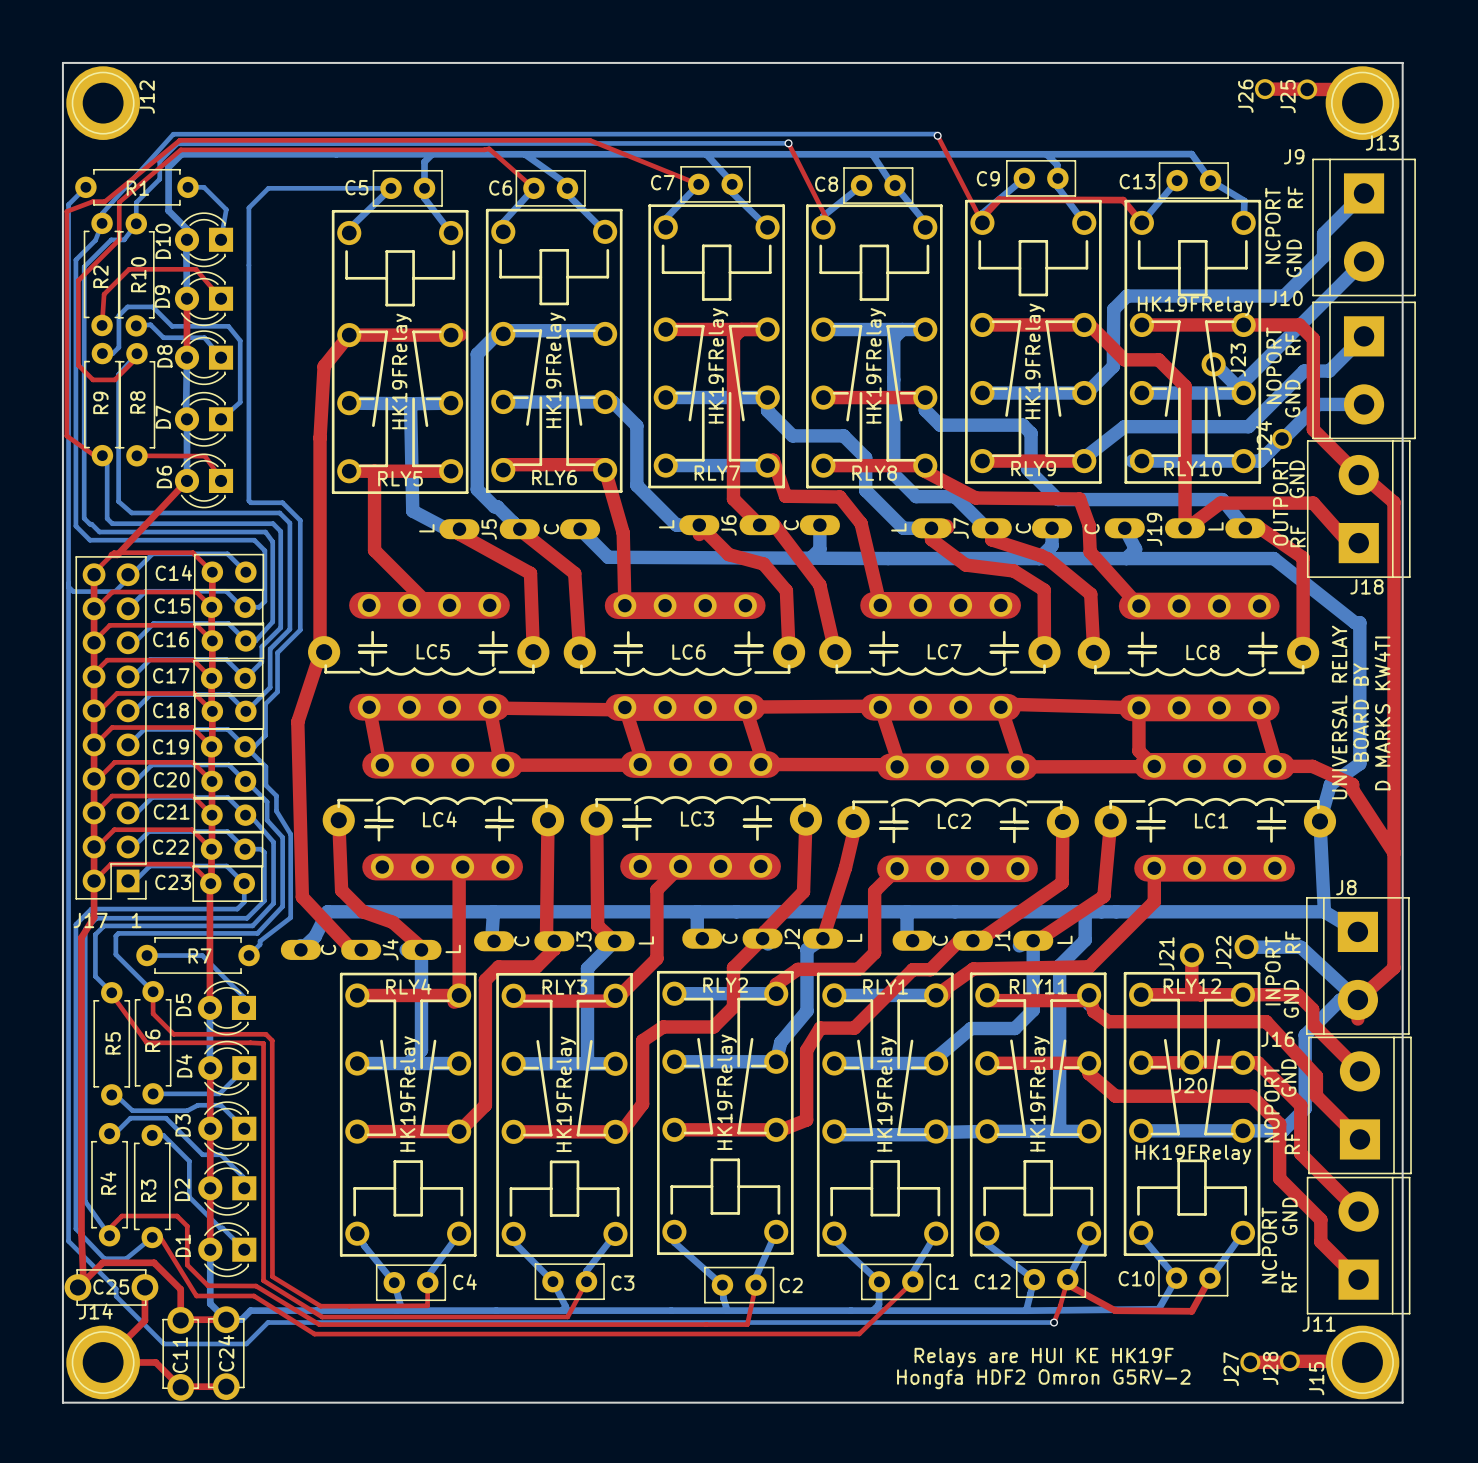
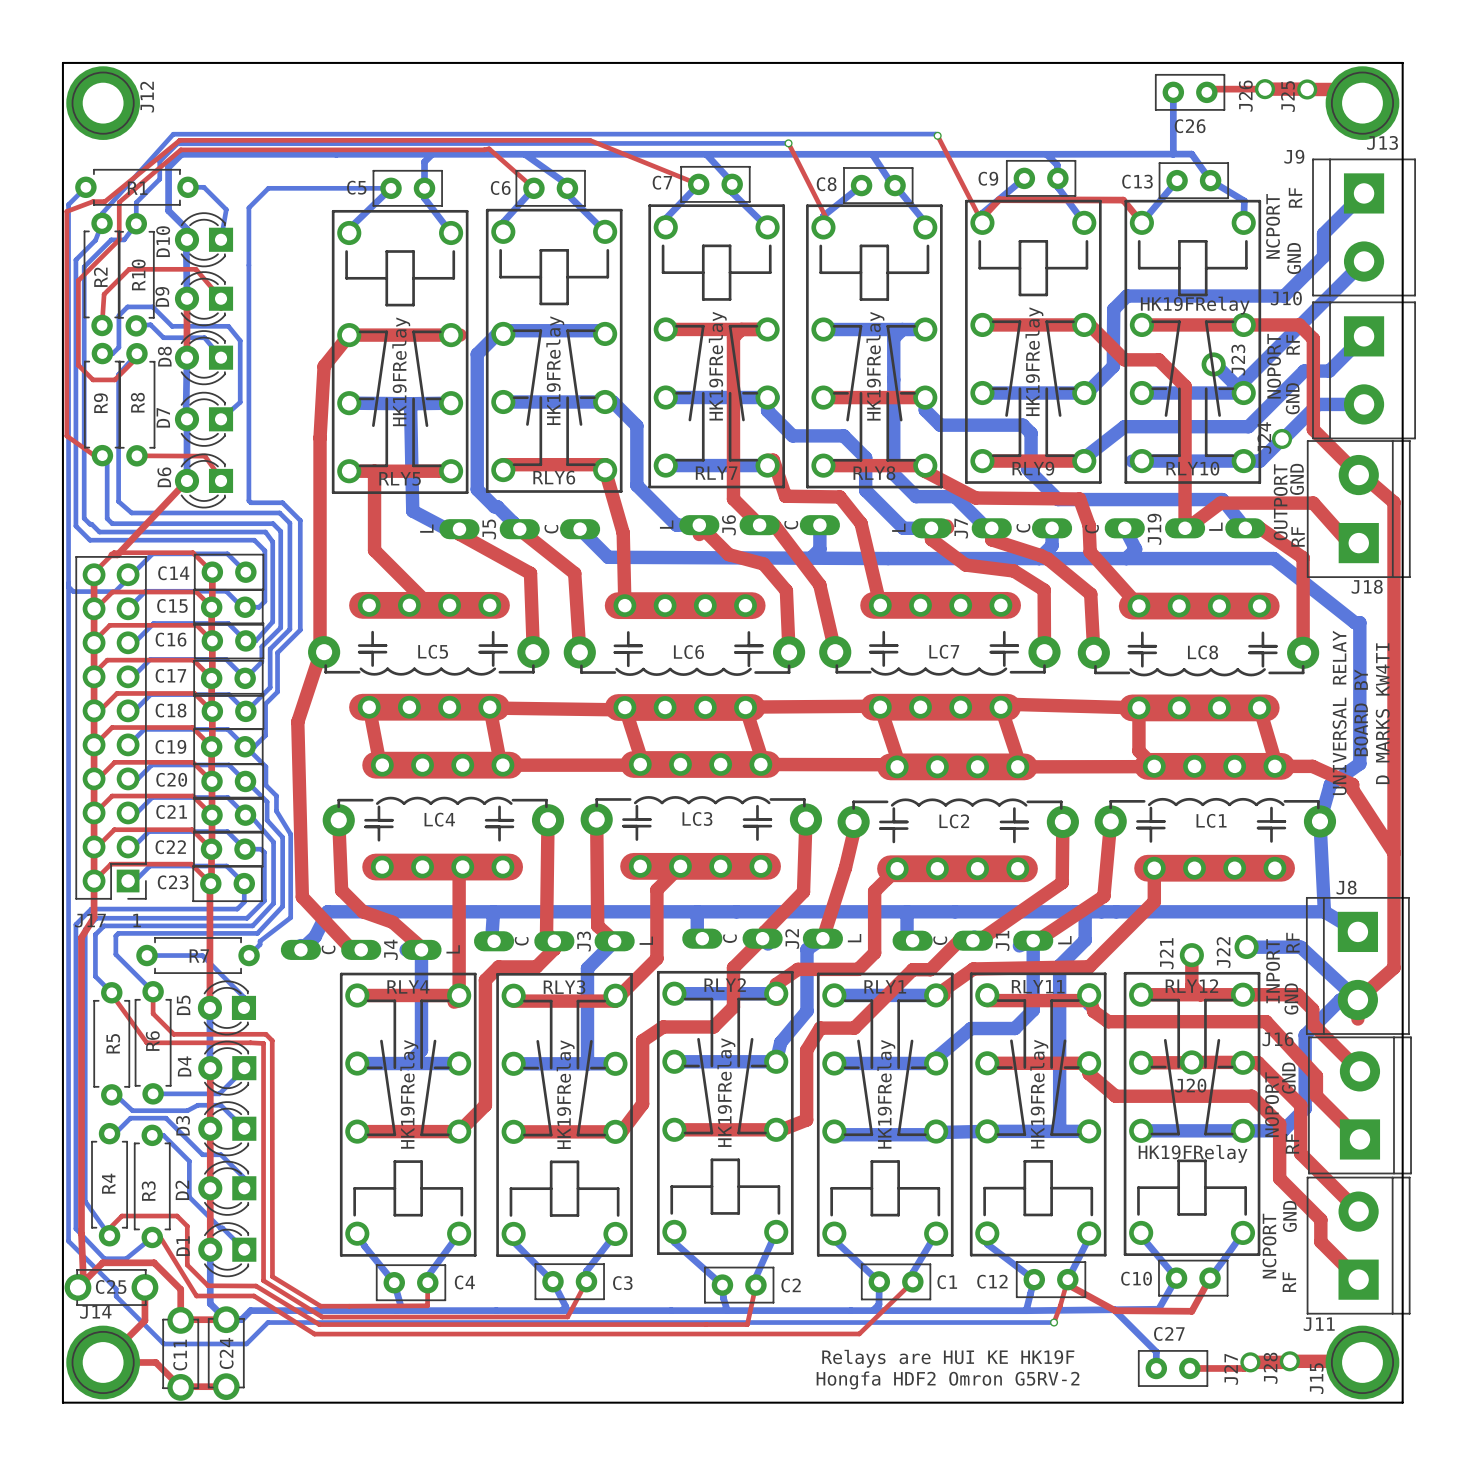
top track: none -> (1265, 89) (1210, 89) (1206, 92)
bottom track: none -> (1173, 92) (1172, 154)
C26: none -> (1190, 92)
bottom track: none -> (1114, 1309) (1156, 1351) (1156, 1368)
text position: Relays are HUI KE HK19F (1044, 1357) -> Relays are HUI KE HK19F (948, 1358)
top track: none -> (1250, 1362) (1244, 1368) (1189, 1368)
C27: none -> (1173, 1368)
text position: Hongfa HDF2 Omron G5RV-2 (1043, 1379) -> Hongfa HDF2 Omron G5RV-2 (948, 1380)

